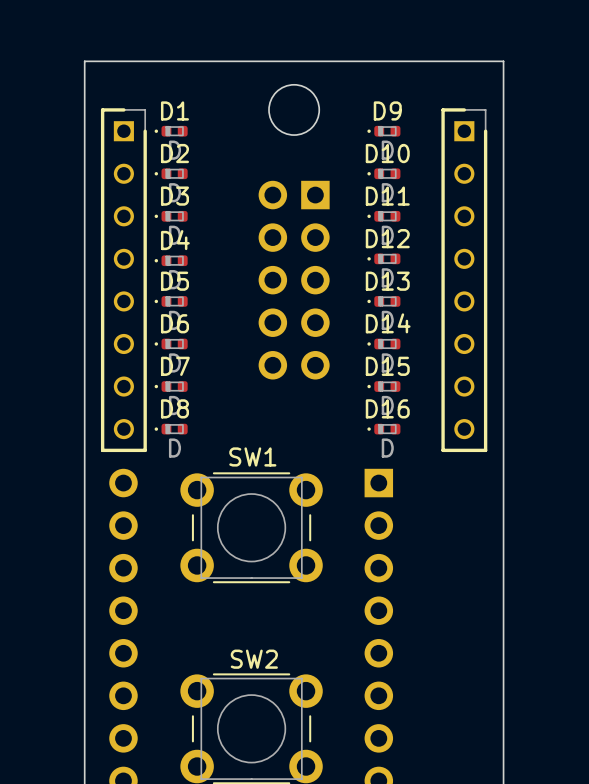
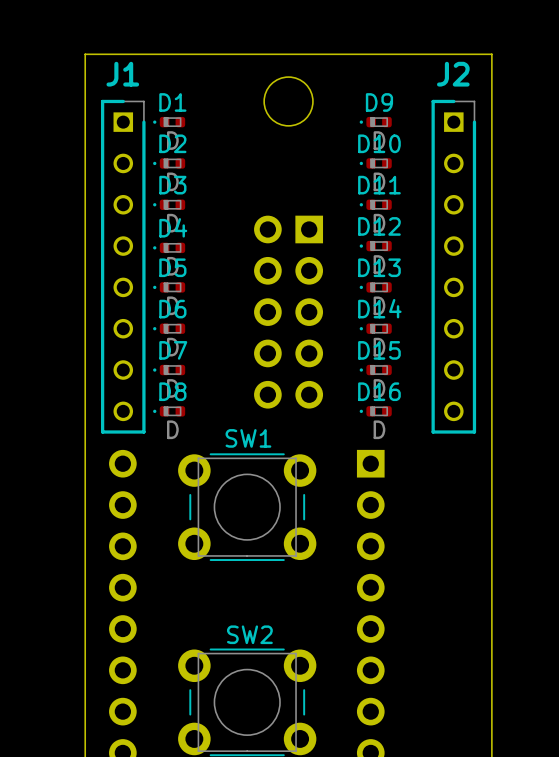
J1 name: none -> J1 (122, 74)
J2 name: none -> J2 (453, 74)
part position: (294, 280) -> (288, 312)

